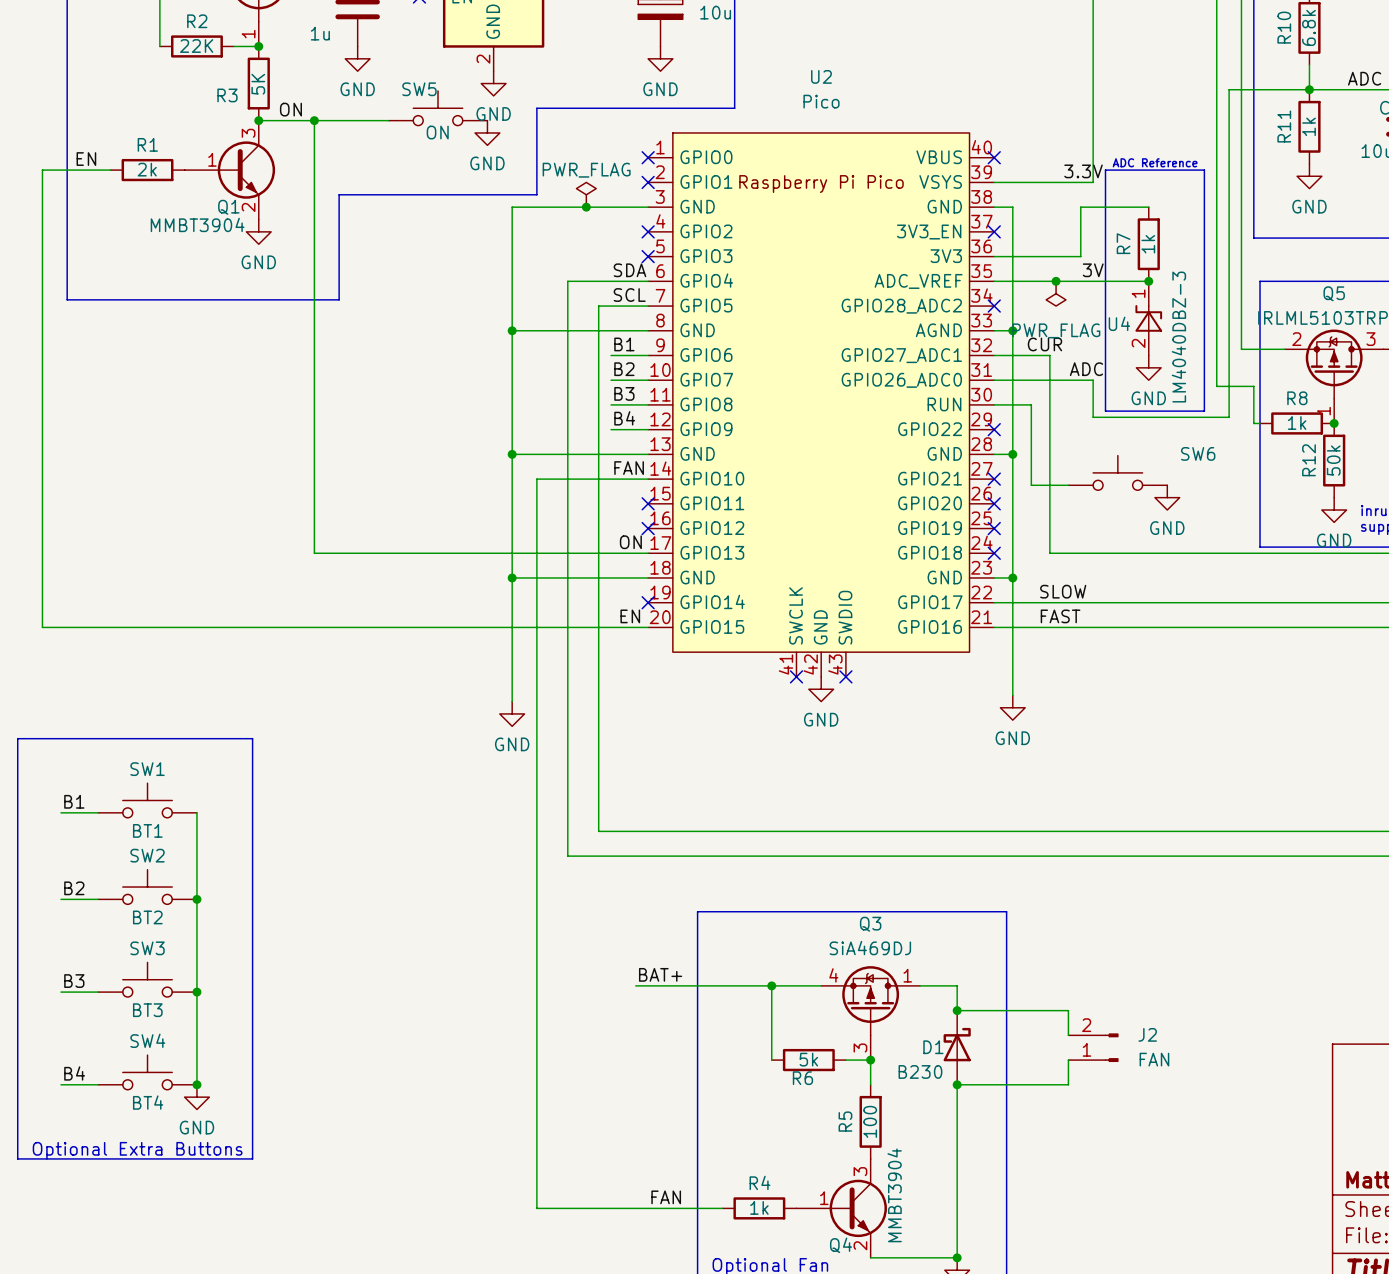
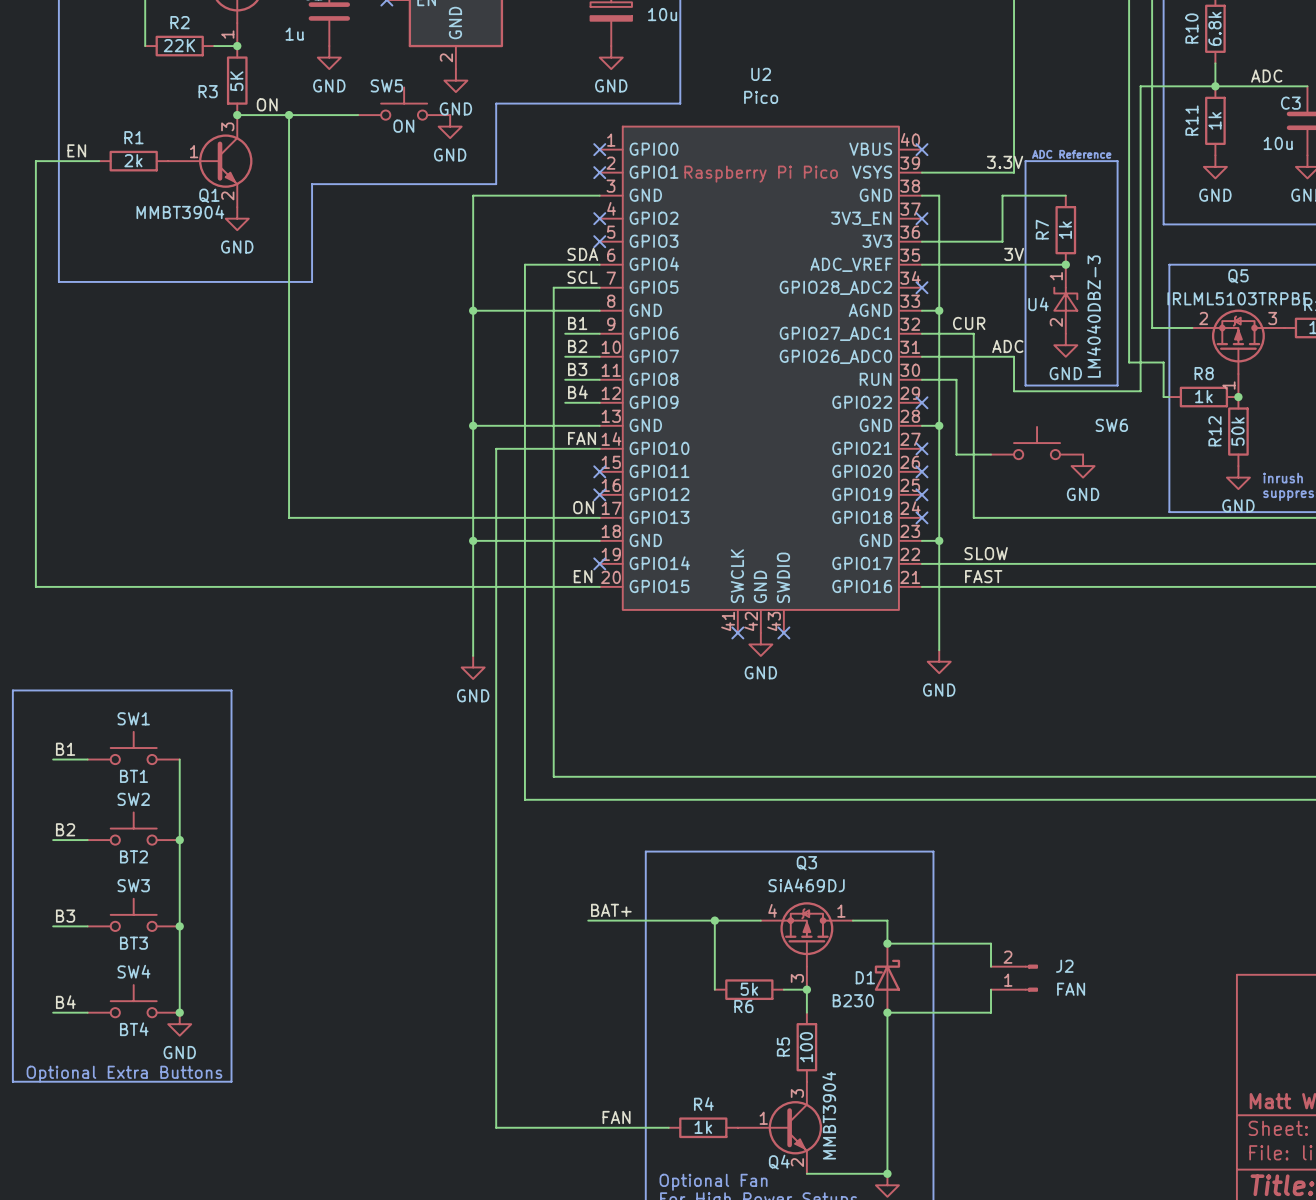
power symbol: PWR_FLAG (586, 194) -> none
junction: (586, 207) -> none
junction: (1056, 281) -> none
power symbol: PWR_FLAG (1056, 293) -> none

